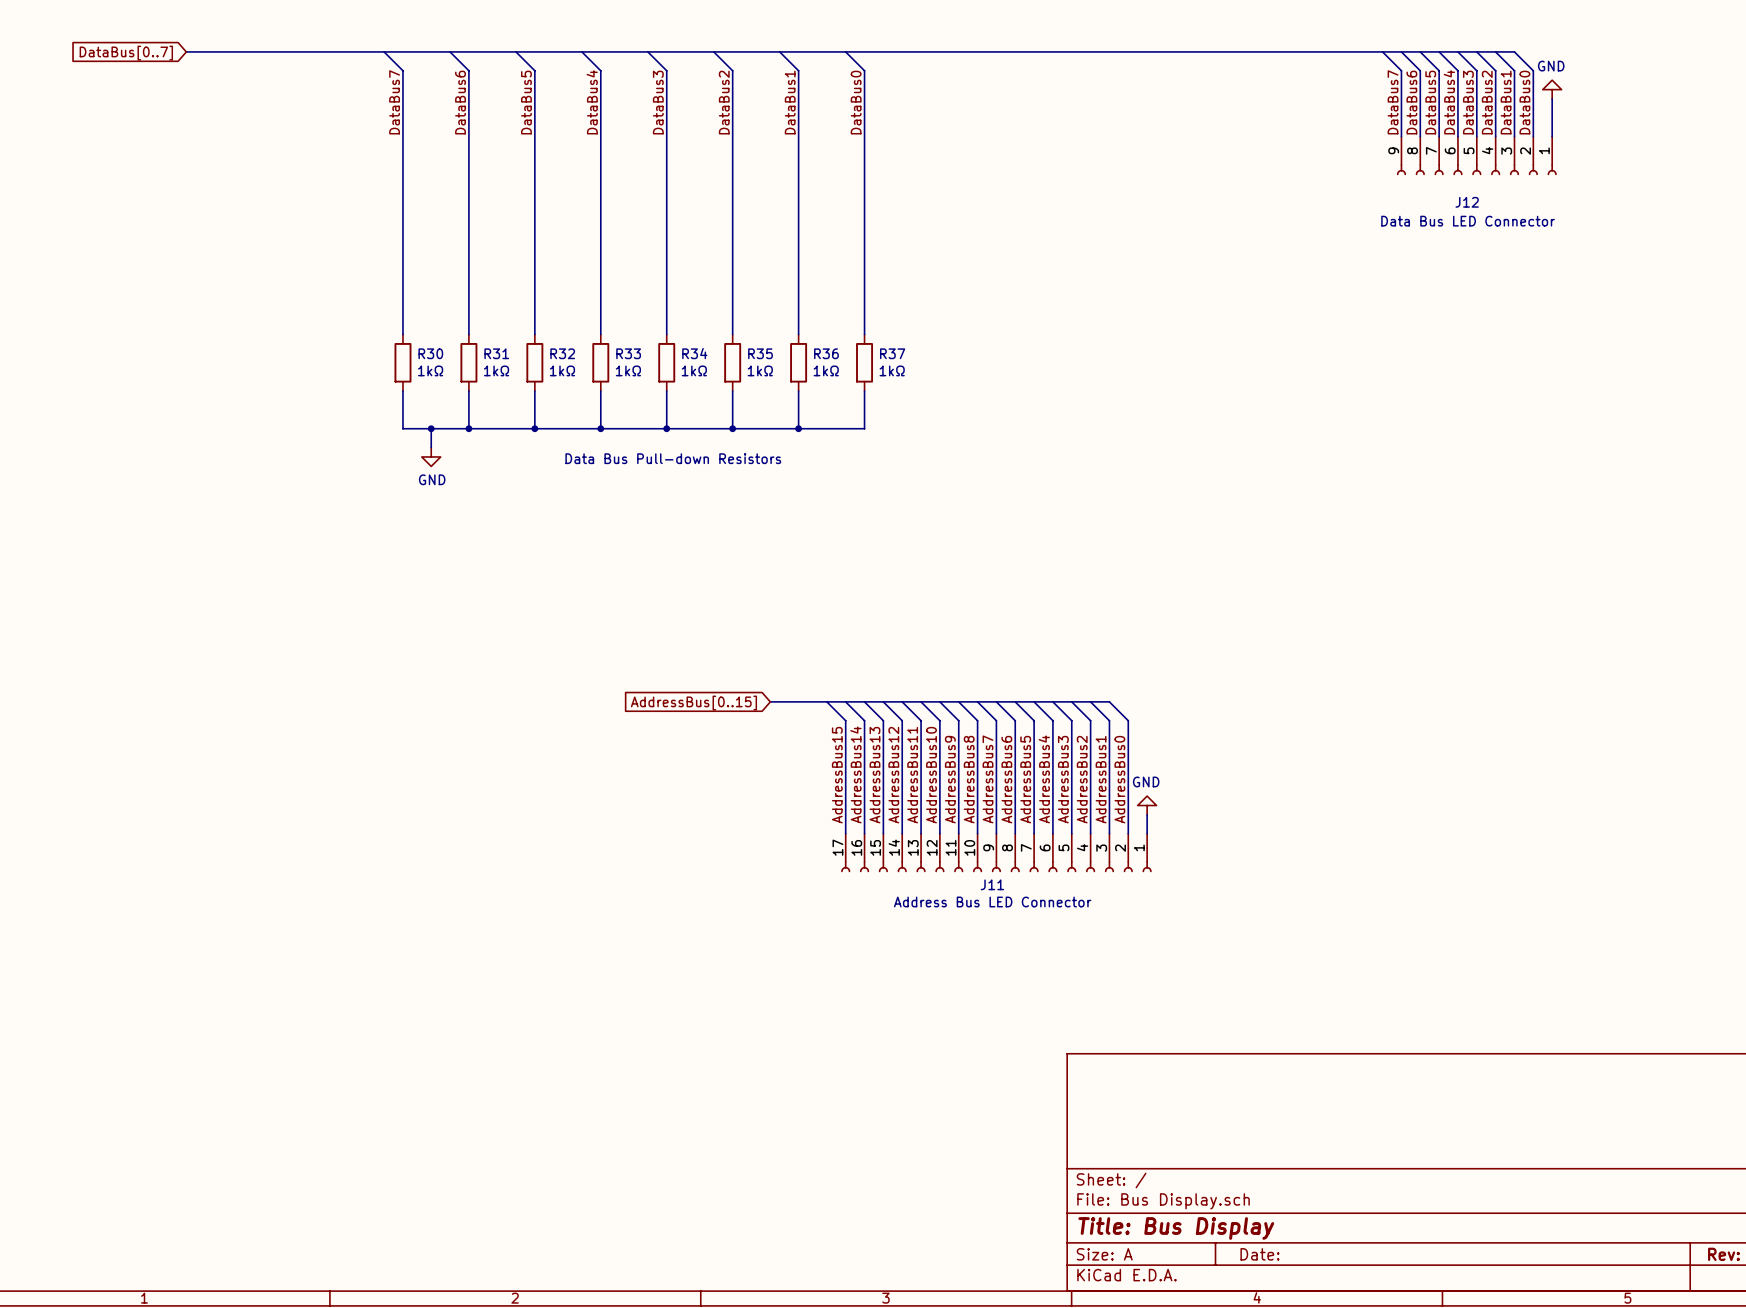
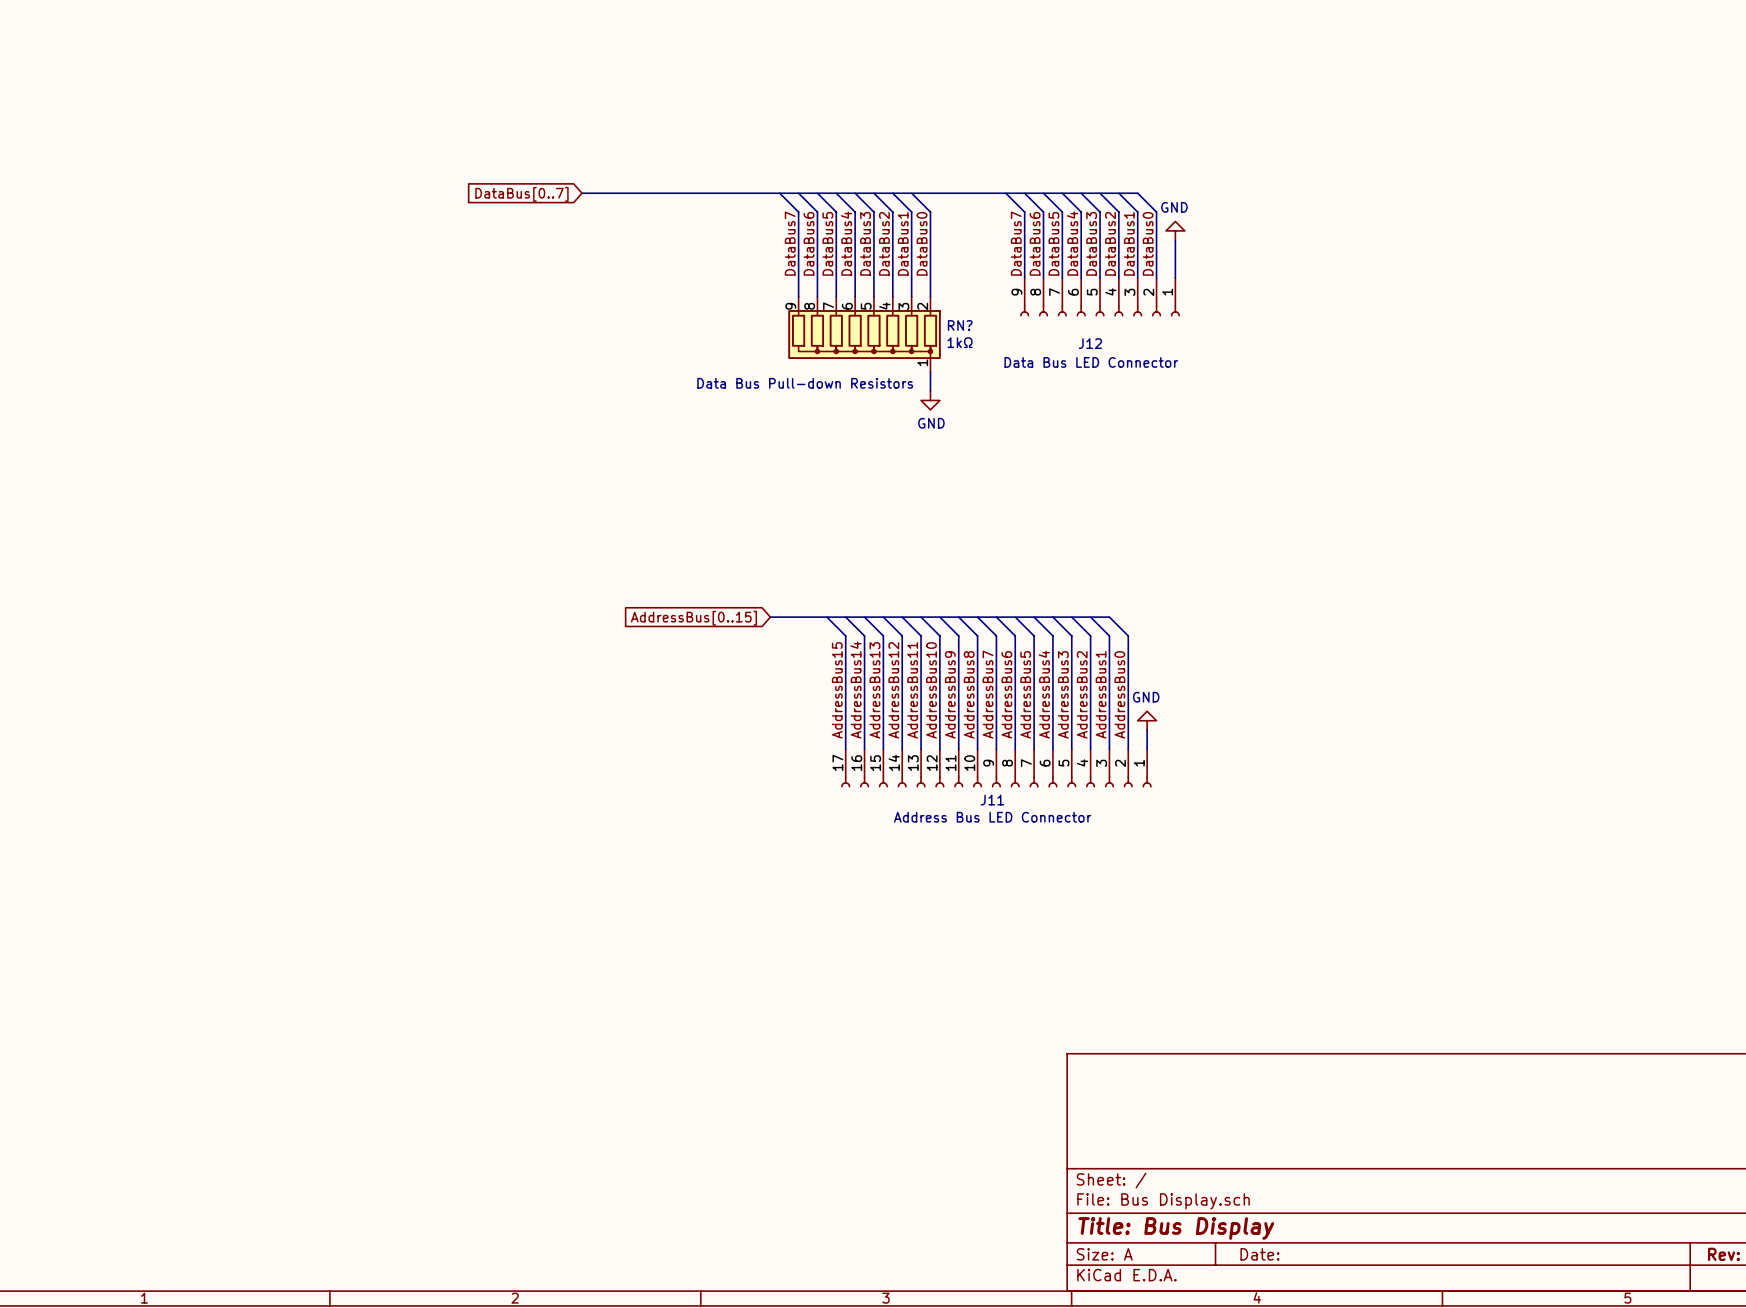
bus: (186, 51) (1514, 51) -> none
wire: (384, 51) (402, 70) (402, 334) -> none
wire: (450, 51) (468, 70) (468, 334) -> none
wire: (516, 51) (534, 70) (534, 334) -> none
wire: (581, 51) (600, 70) (600, 334) -> none
wire: (647, 51) (666, 70) (666, 334) -> none
wire: (713, 51) (732, 70) (732, 334) -> none
wire: (779, 51) (798, 70) (798, 212) -> (779, 193) (798, 212)
wire: (845, 51) (864, 70) (864, 334) -> none
wire: (1382, 51) (1401, 70) (1401, 136) -> none
wire: (1401, 51) (1420, 70) (1420, 136) -> none
wire: (1420, 51) (1439, 70) (1439, 136) -> none
wire: (1439, 51) (1457, 70) (1457, 136) -> none
wire: (1457, 51) (1476, 70) (1476, 136) -> none
wire: (1476, 51) (1495, 70) (1495, 136) -> none
wire: (1495, 51) (1514, 70) (1514, 136) -> none
wire: (1514, 51) (1533, 70) (1533, 136) -> none
global label: DataBus[0..7] (126, 53) -> none
power symbol: GND (1552, 89) -> none
wire: (1552, 99) (1552, 136) -> none
label: DataBus7 (394, 102) -> none
label: DataBus6 (460, 102) -> none
label: DataBus5 (526, 102) -> none
label: DataBus4 (592, 102) -> none
label: DataBus3 (658, 102) -> none
label: DataBus2 (724, 102) -> none
label position: DataBus1 (790, 102) -> DataBus1 (903, 243)
label position: DataBus0 (856, 102) -> DataBus0 (922, 243)
label: DataBus7 (1393, 102) -> none
label: DataBus6 (1411, 102) -> none
label: DataBus5 (1430, 102) -> none
label: DataBus4 (1449, 102) -> none
label: DataBus3 (1468, 102) -> none
label: DataBus2 (1487, 102) -> none
label: DataBus1 (1506, 102) -> none
label: DataBus0 (1524, 102) -> none
J12 position: (1476, 155) -> (1100, 297)
bus: none -> (581, 193) (1137, 193)
wire: none -> (798, 193) (817, 212) (817, 296)
wire: none -> (817, 193) (836, 212) (836, 296)
wire: none -> (836, 193) (855, 212) (855, 296)
wire: none -> (855, 193) (873, 212) (873, 296)
wire: none -> (873, 193) (892, 212) (892, 296)
wire: none -> (892, 193) (911, 212) (911, 296)
wire: none -> (911, 193) (930, 212) (930, 296)
wire: none -> (1005, 193) (1024, 212) (1024, 278)
wire: none -> (1024, 193) (1043, 212) (1043, 278)
wire: none -> (1043, 193) (1062, 212) (1062, 278)
wire: none -> (1062, 193) (1081, 212) (1081, 278)
wire: none -> (1081, 193) (1100, 212) (1100, 278)
wire: none -> (1100, 193) (1118, 212) (1118, 278)
wire: none -> (1118, 193) (1137, 212) (1137, 278)
wire: none -> (1137, 193) (1156, 212) (1156, 278)
global label: none -> DataBus[0..7] (521, 194)
power symbol: none -> GND (1175, 230)
wire: none -> (1175, 240) (1175, 278)
label: none -> DataBus7 (790, 243)
label: none -> DataBus6 (809, 243)
label: none -> DataBus5 (827, 243)
label: none -> DataBus4 (846, 243)
label: none -> DataBus3 (865, 243)
label: none -> DataBus2 (884, 243)
label: none -> DataBus7 (1016, 243)
label: none -> DataBus6 (1035, 243)
label: none -> DataBus5 (1053, 243)
label: none -> DataBus4 (1072, 243)
label: none -> DataBus3 (1091, 243)
label: none -> DataBus2 (1110, 243)
label: none -> DataBus1 (1129, 243)
label: none -> DataBus0 (1148, 243)
RN?: none -> 1kΩ (864, 334)
R30: 1kΩ (402, 362) -> none
R31: 1kΩ (468, 362) -> none
R32: 1kΩ (534, 362) -> none
R33: 1kΩ (600, 362) -> none
R34: 1kΩ (666, 362) -> none
R35: 1kΩ (732, 362) -> none
R36: 1kΩ (798, 362) -> none
R37: 1kΩ (864, 362) -> none
wire: none -> (930, 372) (930, 391)
wire: (402, 391) (402, 428) (864, 428) (864, 391) -> none
wire: (468, 391) (468, 428) -> none
wire: (534, 391) (534, 428) -> none
wire: (600, 391) (600, 428) -> none
wire: (666, 391) (666, 428) -> none
wire: (732, 391) (732, 428) -> none
wire: (798, 391) (798, 428) -> none
power symbol: none -> GND (930, 400)
wire: (431, 428) (431, 447) -> none
junction: (431, 428) -> none
junction: (468, 428) -> none
junction: (534, 428) -> none
junction: (600, 428) -> none
junction: (666, 428) -> none
junction: (732, 428) -> none
junction: (798, 428) -> none
power symbol: GND (431, 456) -> none
text position: Data Bus Pull-down Resistors (673, 458) -> Data Bus Pull-down Resistors (805, 383)
bus: (770, 701) (1109, 701) -> (770, 617) (1109, 617)
wire: (826, 701) (845, 720) -> (826, 617) (845, 635) (845, 720)
wire: (845, 701) (864, 720) -> (845, 617) (864, 635) (864, 720)
wire: (864, 701) (883, 720) -> (864, 617) (883, 635) (883, 720)
wire: (883, 701) (902, 720) -> (883, 617) (902, 635) (902, 720)
wire: (902, 701) (921, 720) -> (902, 617) (921, 635) (921, 720)
wire: (921, 701) (939, 720) -> (921, 617) (939, 635) (939, 720)
wire: (939, 701) (958, 720) -> (939, 617) (958, 635) (958, 720)
wire: (958, 701) (977, 720) -> (958, 617) (977, 635) (977, 720)
wire: (977, 701) (996, 720) -> (977, 617) (996, 635) (996, 720)
wire: (996, 701) (1015, 720) -> (996, 617) (1015, 635) (1015, 720)
wire: (1015, 701) (1034, 720) -> (1015, 617) (1034, 635) (1034, 720)
wire: (1034, 701) (1052, 720) -> (1034, 617) (1052, 635) (1052, 720)
wire: (1052, 701) (1071, 720) -> (1052, 617) (1071, 635) (1071, 720)
wire: (1071, 701) (1090, 720) -> (1071, 617) (1090, 635) (1090, 720)
wire: (1090, 701) (1109, 720) -> (1090, 617) (1109, 635) (1109, 720)
wire: (1109, 701) (1128, 720) -> (1109, 617) (1128, 635) (1128, 720)
global label position: AddressBus[0..15] (693, 703) -> AddressBus[0..15] (693, 618)
wire: (845, 748) (845, 833) -> none
wire: (864, 748) (864, 833) -> none
wire: (883, 748) (883, 833) -> none
wire: (902, 748) (902, 833) -> none
wire: (921, 748) (921, 833) -> none
wire: (939, 748) (939, 833) -> none
wire: (958, 748) (958, 833) -> none
wire: (977, 748) (977, 833) -> none
wire: (996, 748) (996, 833) -> none
wire: (1015, 748) (1015, 833) -> none
wire: (1034, 748) (1034, 833) -> none
wire: (1052, 748) (1052, 833) -> none
wire: (1071, 748) (1071, 833) -> none
wire: (1090, 748) (1090, 833) -> none
wire: (1109, 748) (1109, 833) -> none
wire: (1128, 748) (1128, 833) -> none
label position: AddressBus14 (855, 774) -> AddressBus14 (855, 690)
label position: AddressBus15 (837, 775) -> AddressBus15 (837, 690)
label position: AddressBus13 (874, 775) -> AddressBus13 (874, 690)
label position: AddressBus12 (893, 775) -> AddressBus12 (893, 690)
label position: AddressBus11 (912, 775) -> AddressBus11 (912, 690)
label position: AddressBus10 (931, 775) -> AddressBus10 (931, 690)
label position: AddressBus9 (950, 779) -> AddressBus9 (950, 694)
label position: AddressBus8 (969, 779) -> AddressBus8 (969, 694)
label position: AddressBus7 (988, 779) -> AddressBus7 (988, 694)
label position: AddressBus6 (1006, 779) -> AddressBus6 (1006, 694)
label position: AddressBus5 (1025, 779) -> AddressBus5 (1025, 694)
label position: AddressBus4 (1044, 779) -> AddressBus4 (1044, 694)
label position: AddressBus3 (1063, 779) -> AddressBus3 (1063, 694)
label position: AddressBus2 (1082, 779) -> AddressBus2 (1082, 694)
label position: AddressBus1 (1101, 779) -> AddressBus1 (1101, 694)
label position: AddressBus0 (1119, 779) -> AddressBus0 (1119, 694)
power symbol position: GND (1147, 805) -> GND (1147, 720)
wire: (1147, 814) (1147, 833) -> (1147, 730) (1147, 748)
J11 position: (996, 852) -> (996, 768)

